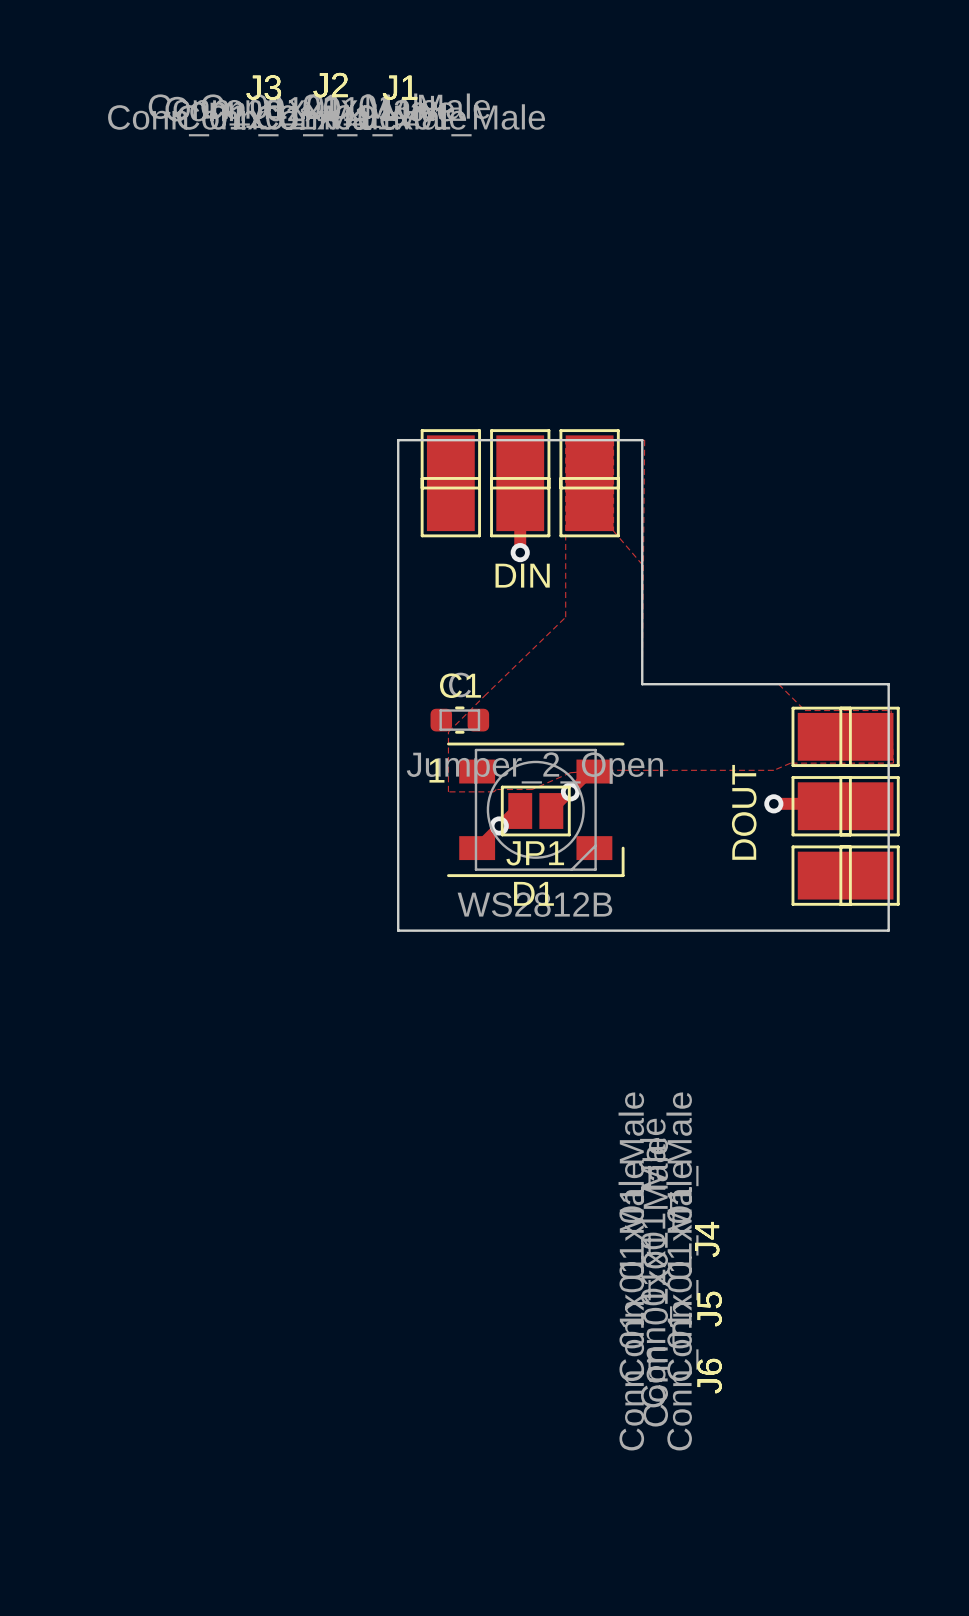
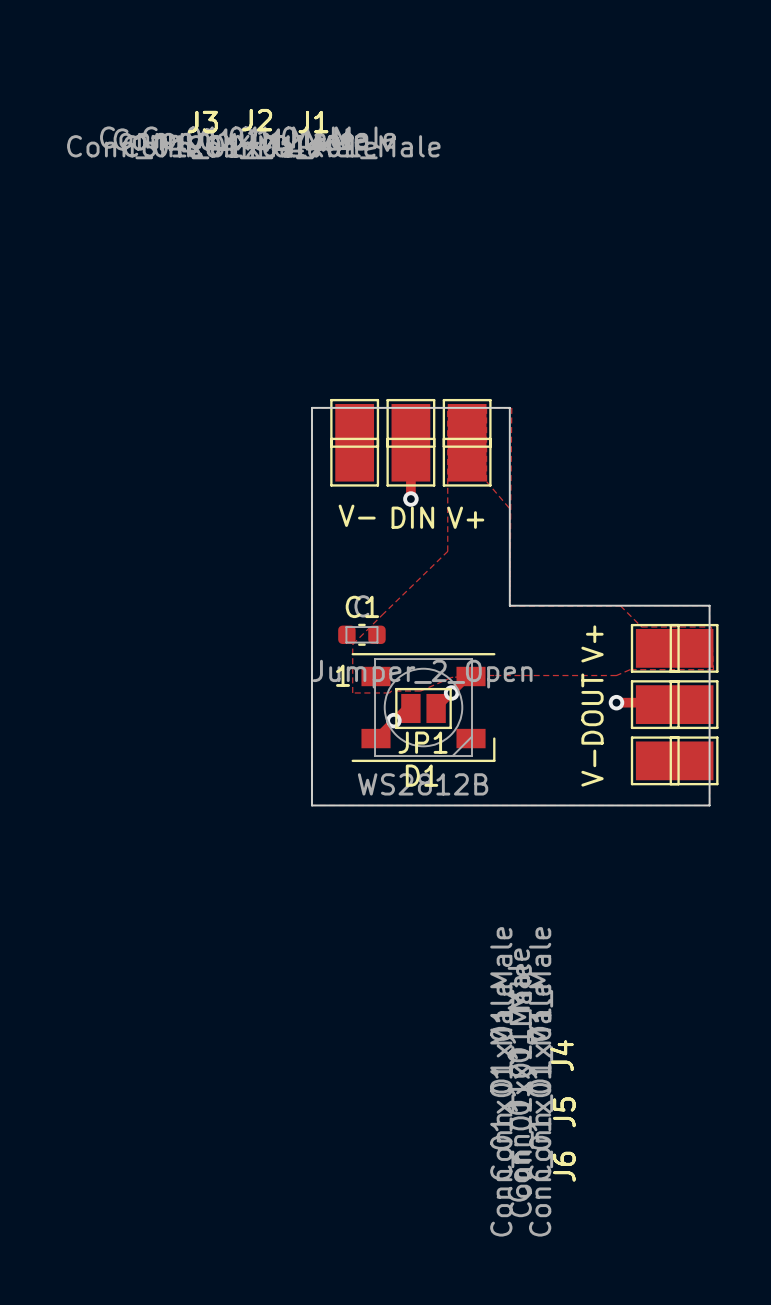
text: none -> V- (357, 515)
text: none -> V+ (465, 517)
text: none -> V+ (592, 643)
text: none -> V- (592, 768)

